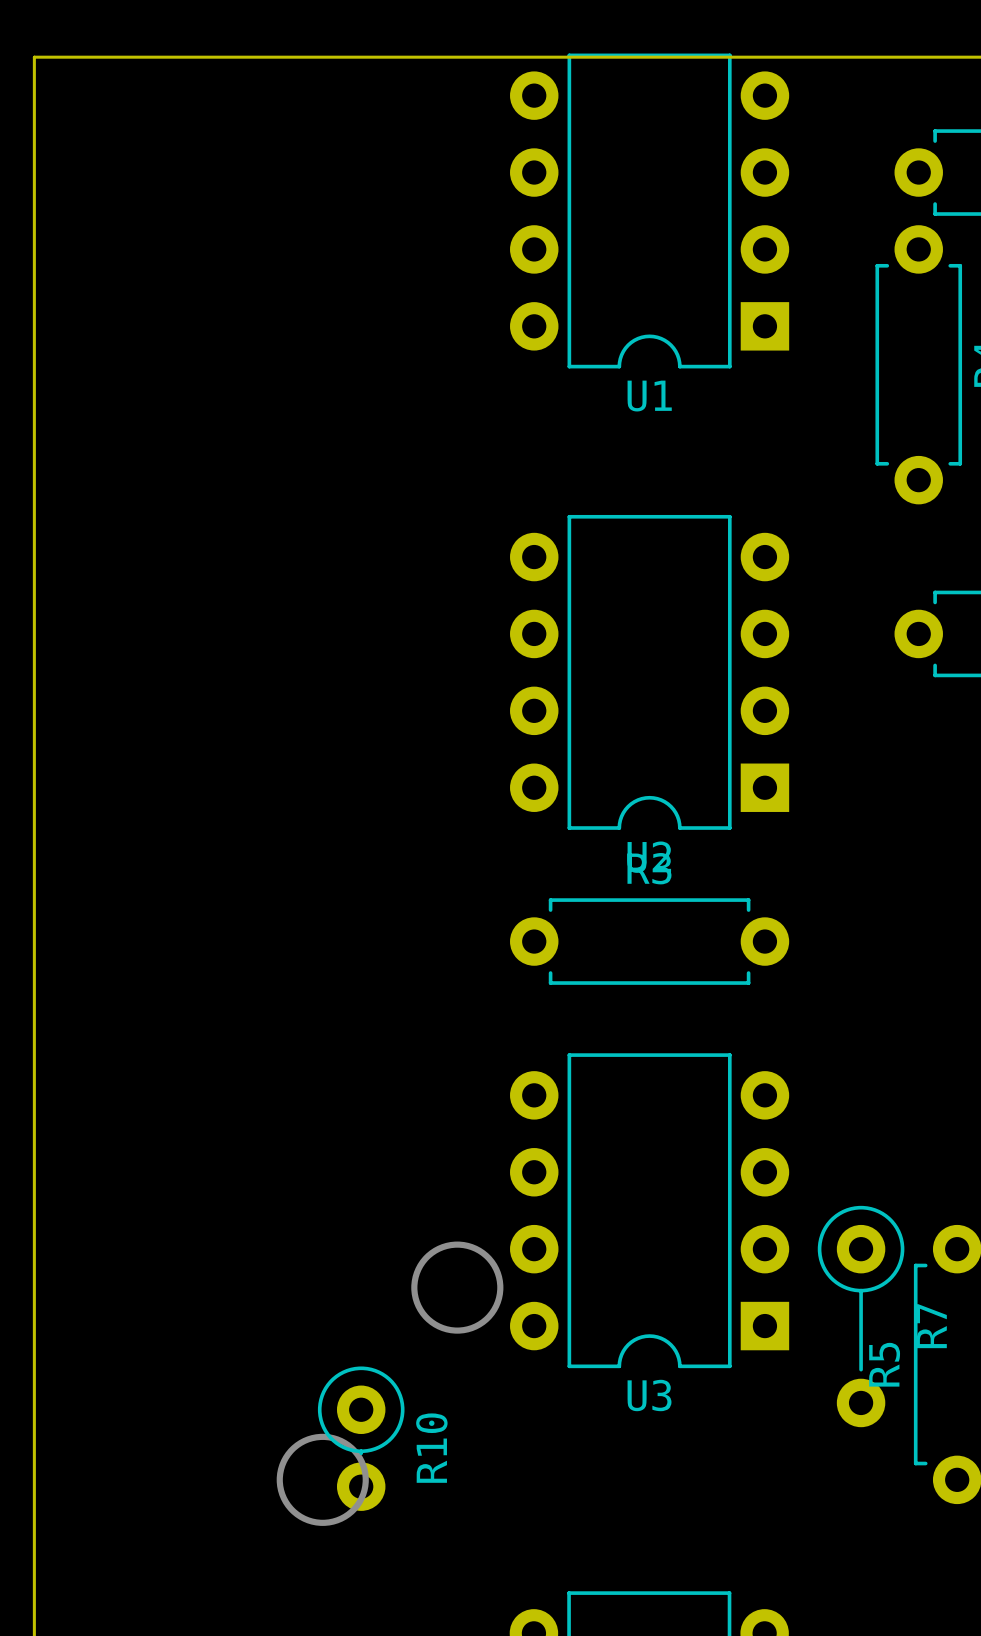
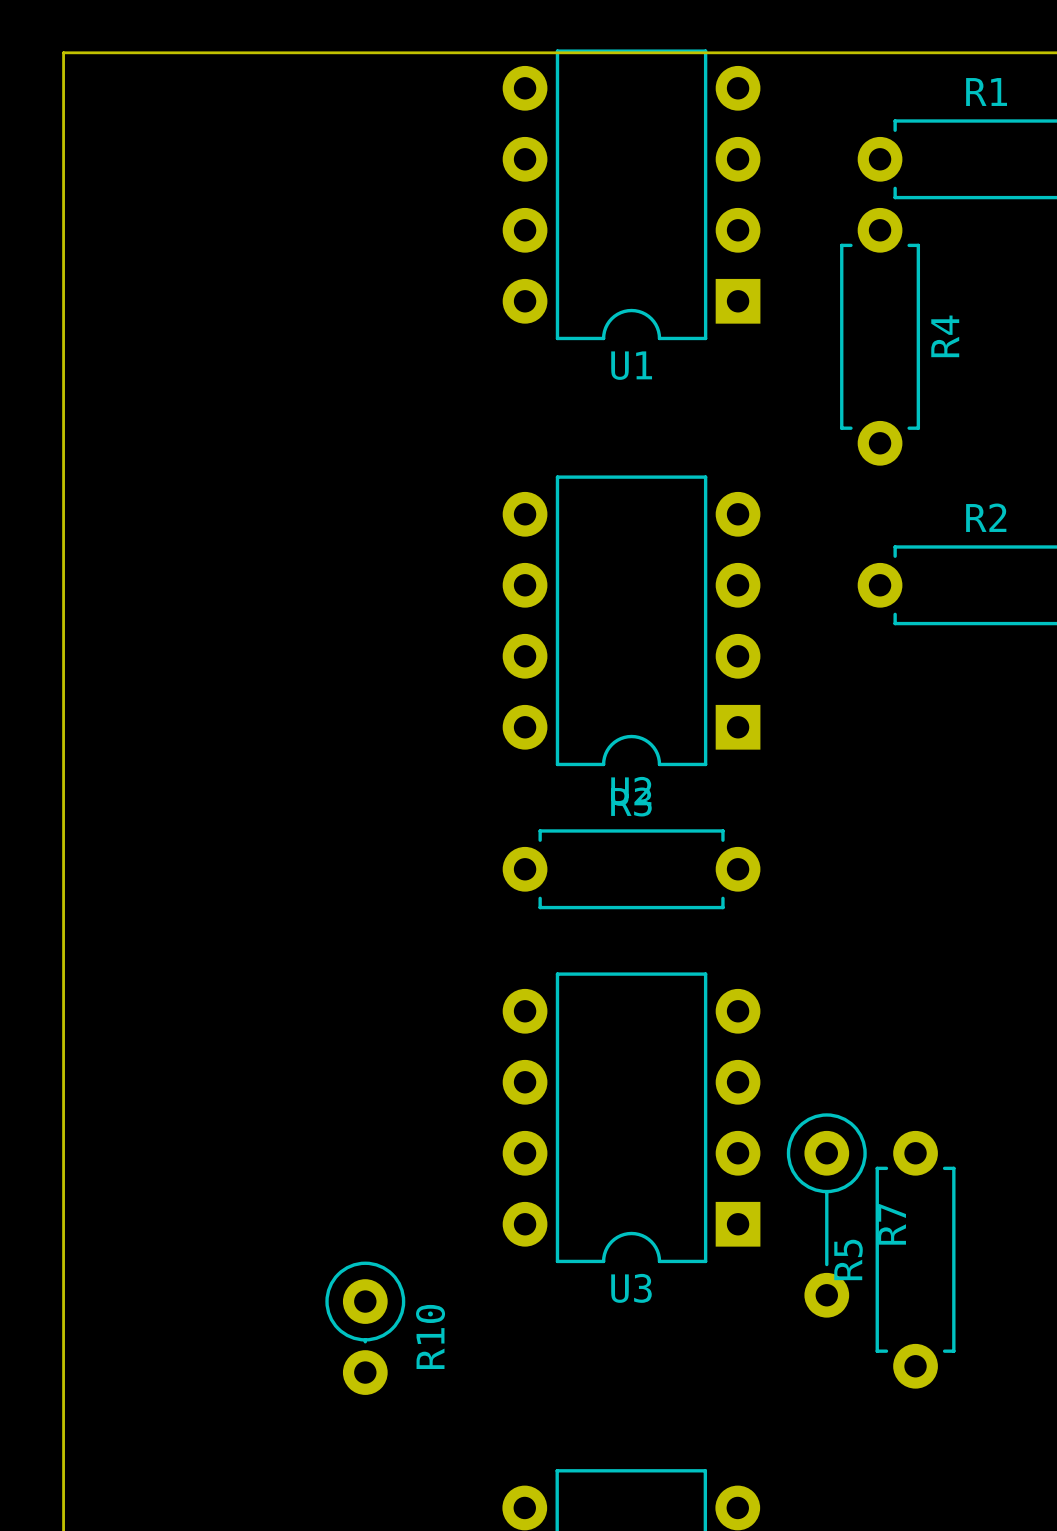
drawing: [411, 1241, 504, 1334] -> none
drawing: [276, 1433, 369, 1526] -> none

